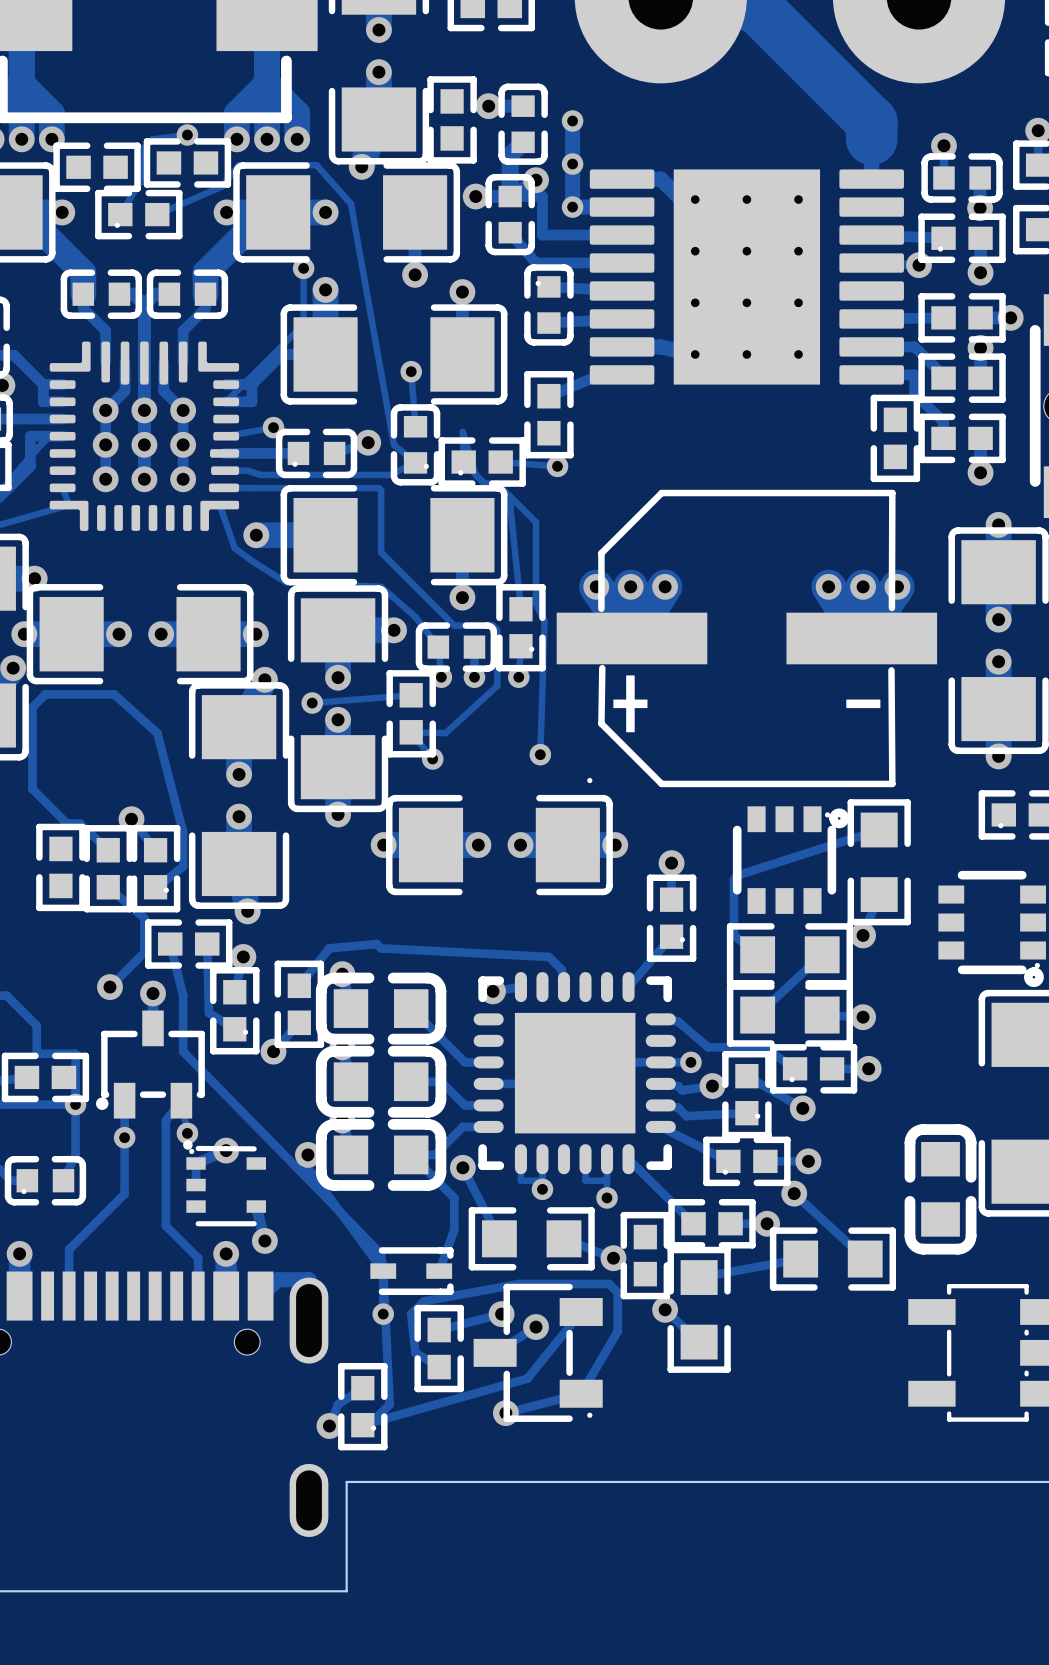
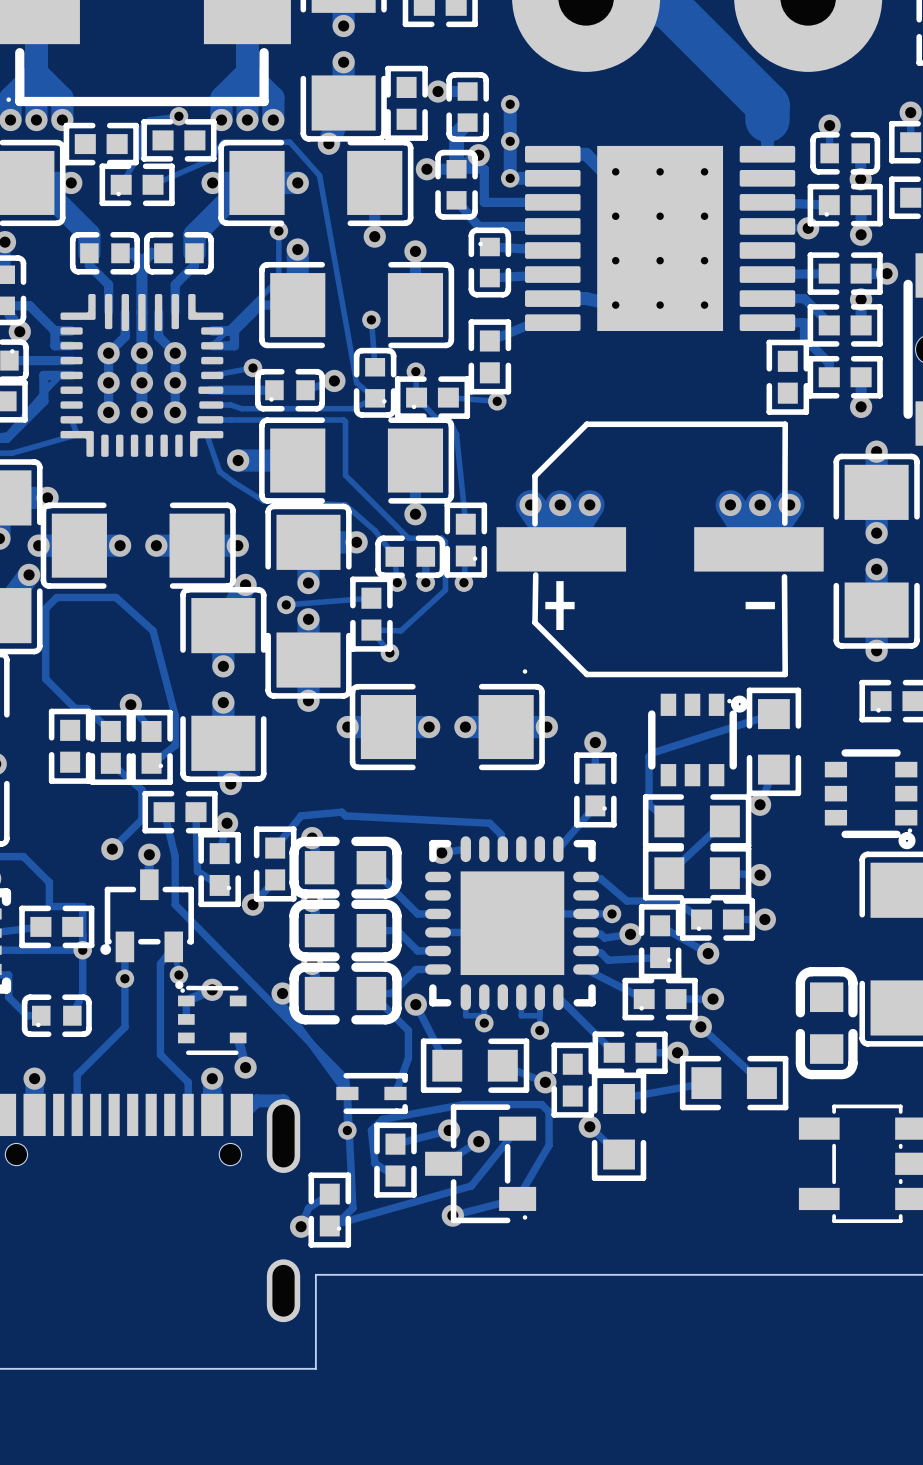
track: (462, 431) (475, 474) (484, 483) (497, 483) (536, 522) (536, 604) (544, 621) (540, 754) -> none
via: none -> (415, 371)
via: (540, 754) -> none

